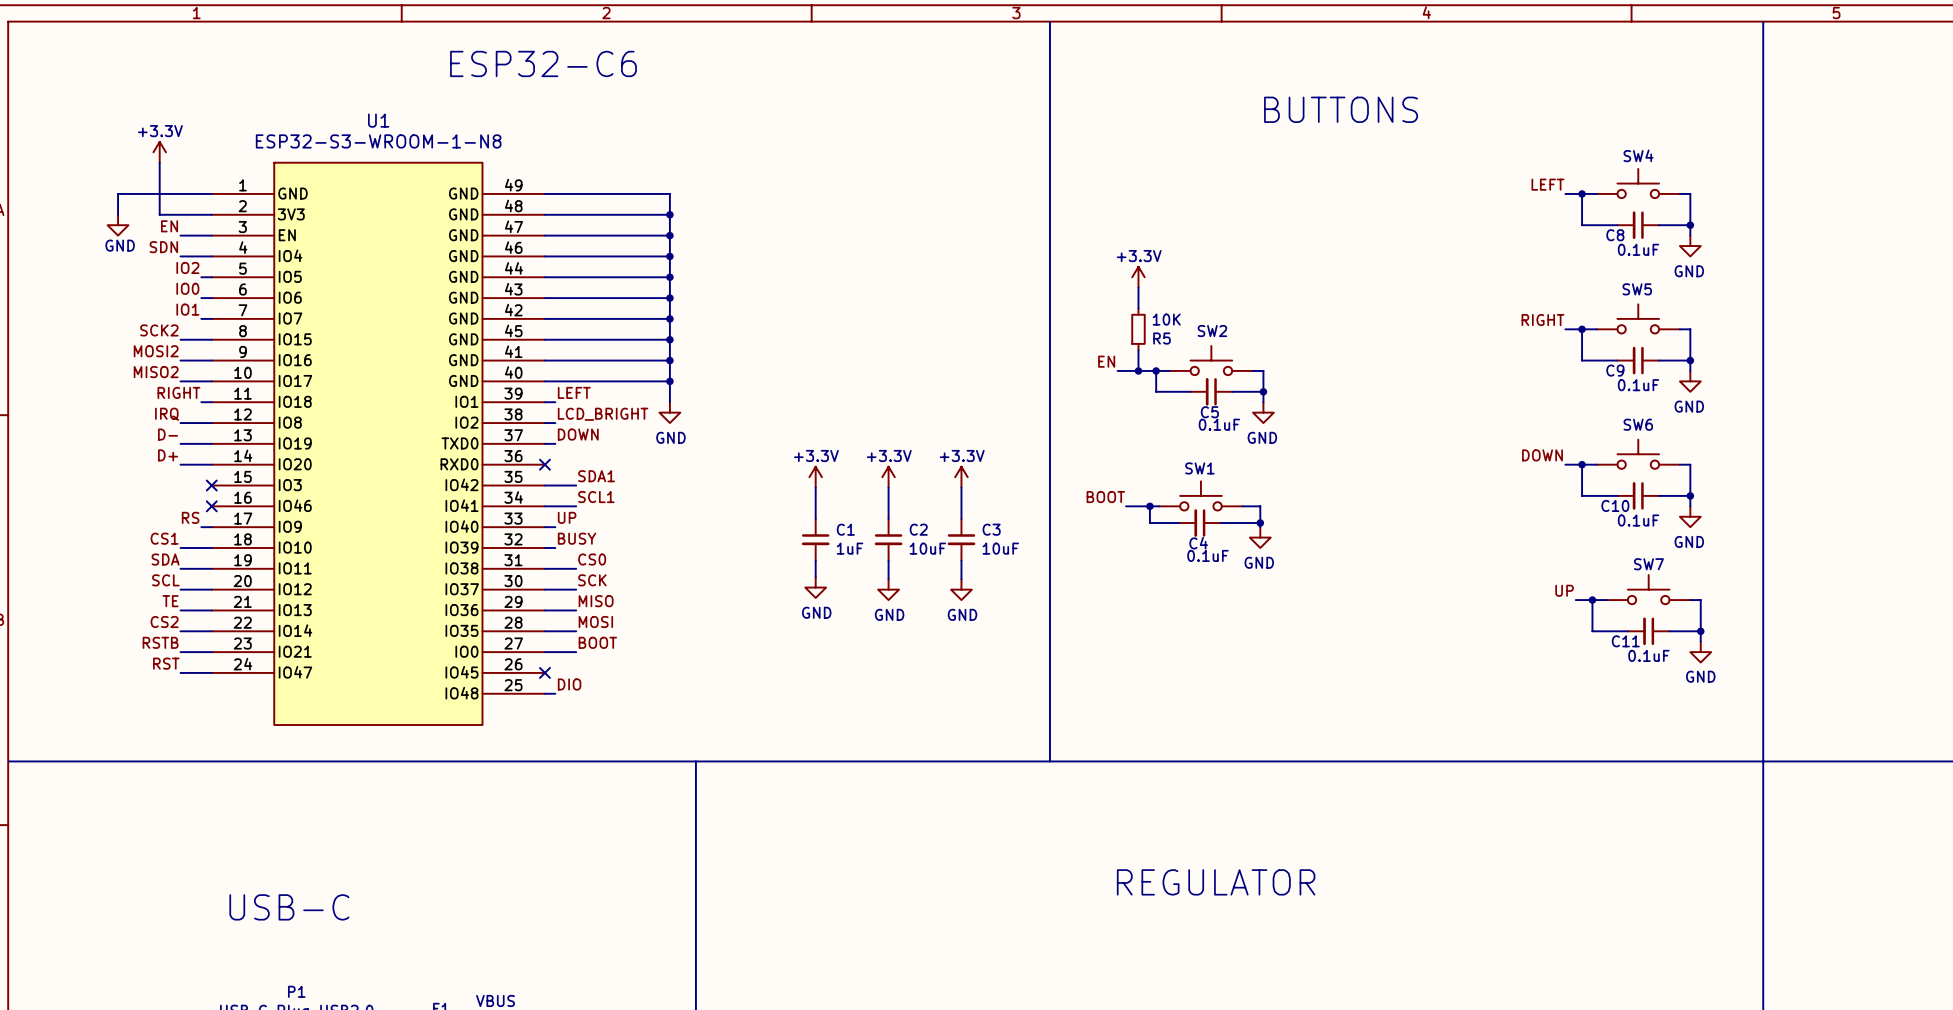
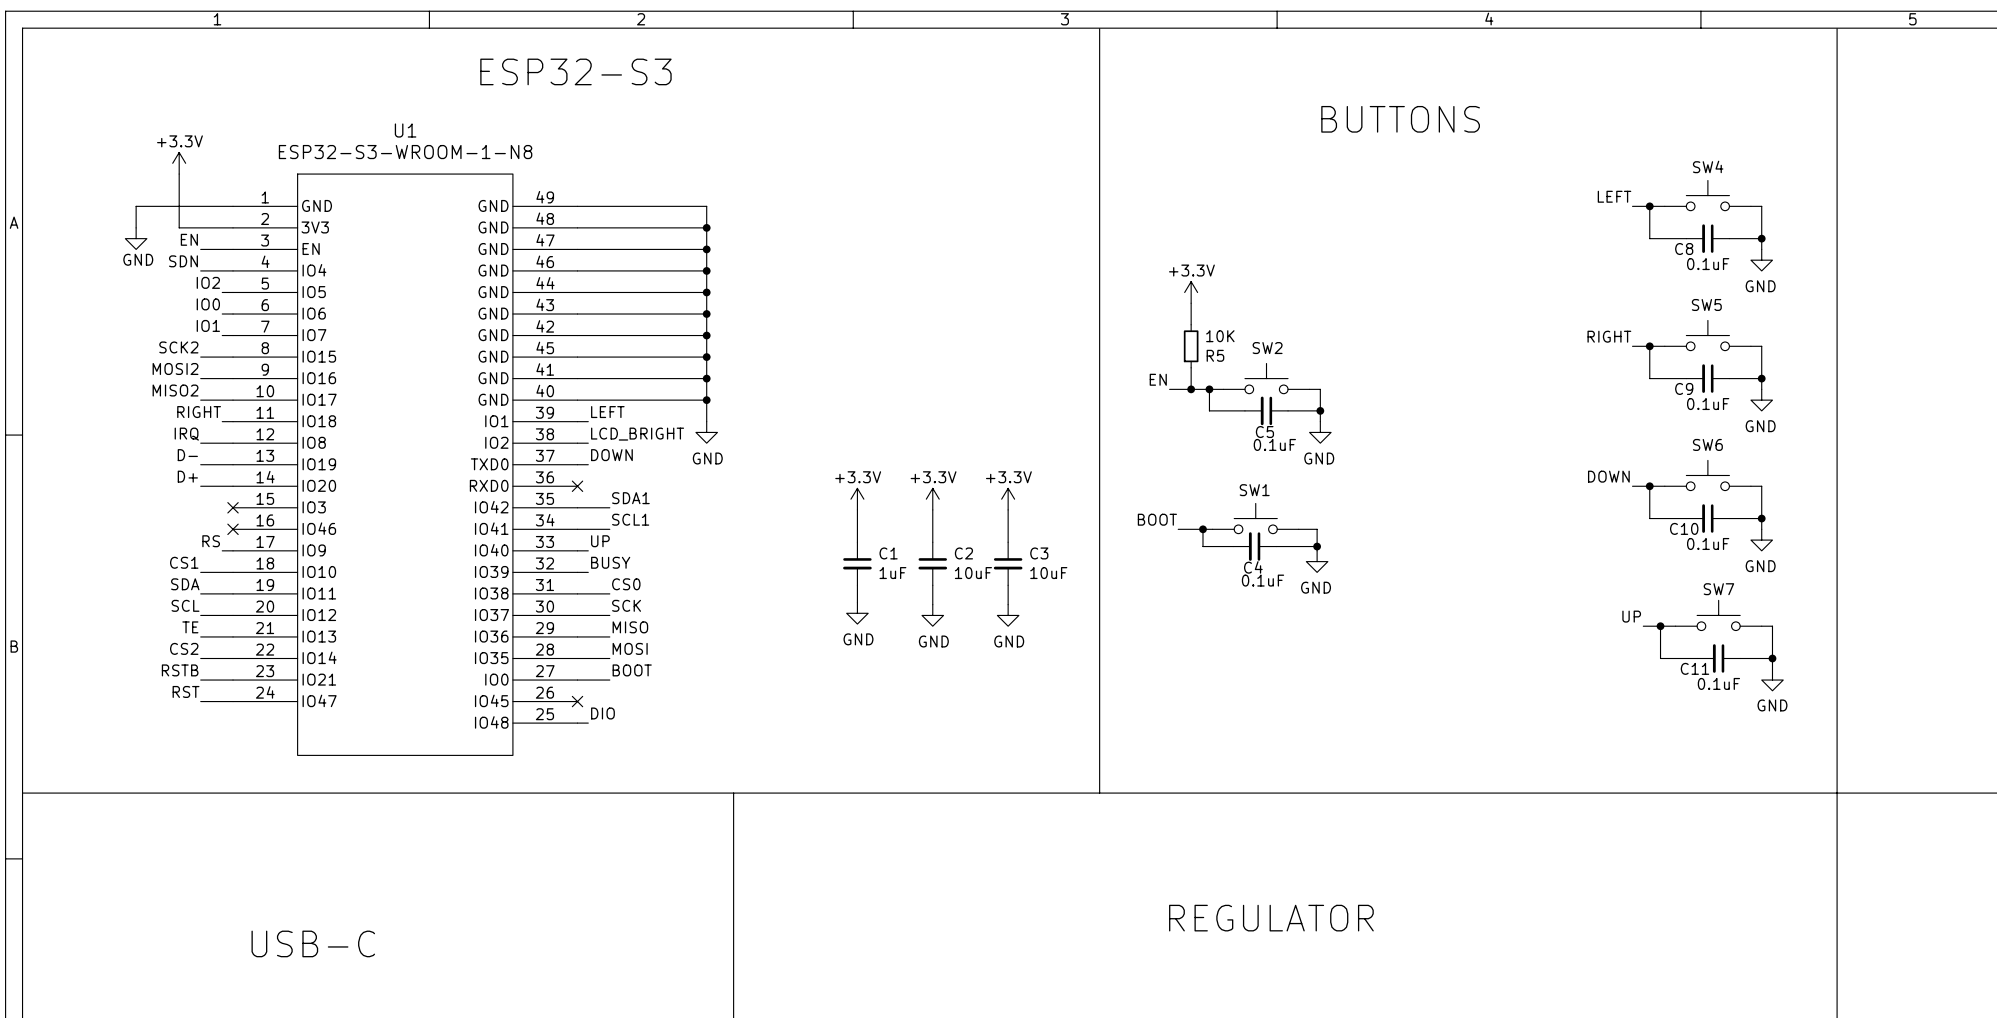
text: ESP32-C6 (543, 63) -> ESP32-S3 (575, 71)

